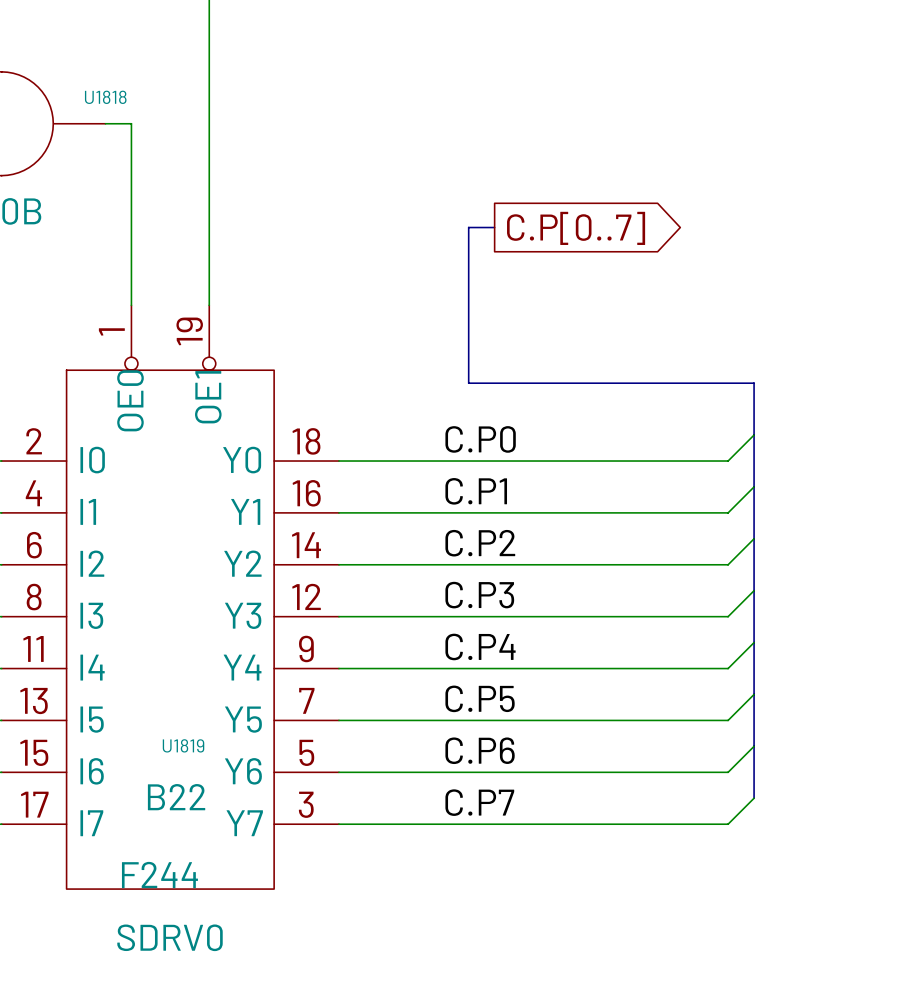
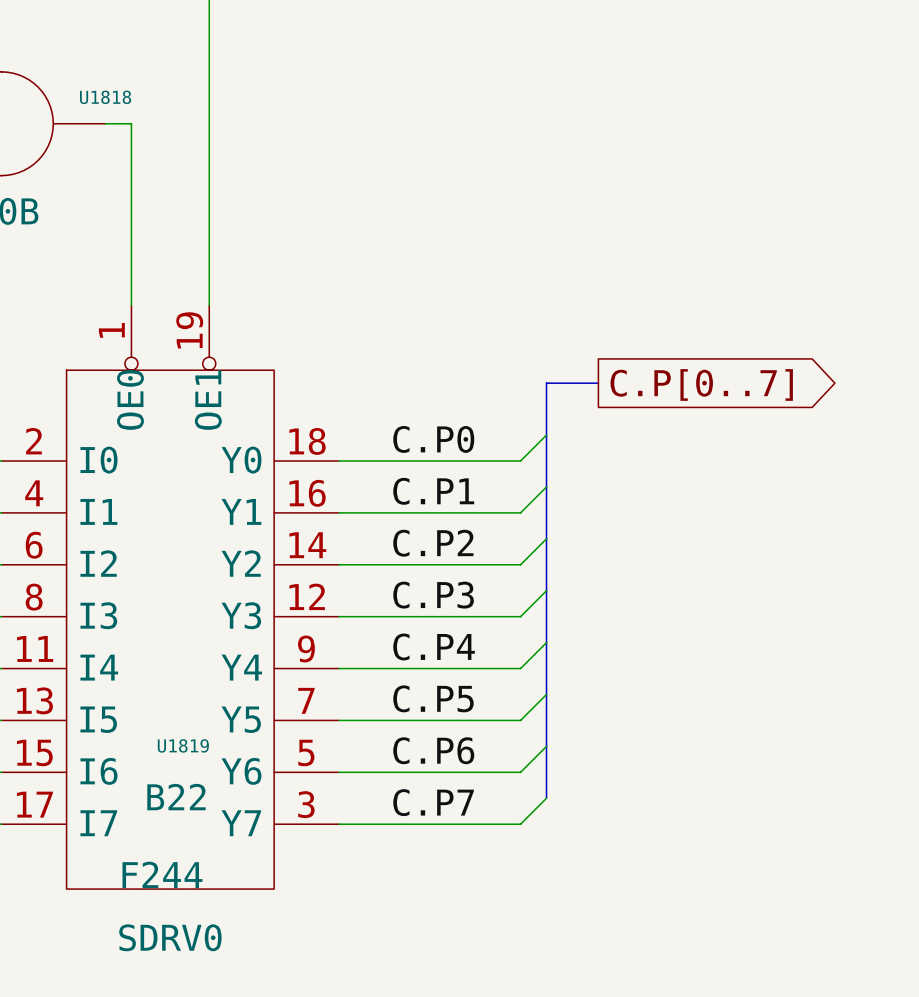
bus: (494, 227) (468, 227) (468, 383) (546, 383) -> (546, 798) (546, 383)
global label position: C.P[0..7] (576, 228) -> C.P[0..7] (701, 384)
bus: (598, 383) (754, 383) (754, 798) -> none
wire: (754, 435) (728, 461) (520, 461) -> (546, 435) (520, 461)
label position: C.P0 (480, 439) -> C.P0 (433, 439)
wire: (754, 486) (728, 512) (520, 512) -> (546, 486) (520, 512)
label position: C.P1 (476, 491) -> C.P1 (433, 491)
wire: (754, 538) (728, 564) (520, 564) -> (546, 538) (520, 564)
label position: C.P2 (480, 543) -> C.P2 (433, 543)
wire: (754, 590) (728, 616) (520, 616) -> (546, 590) (520, 616)
label position: C.P3 (479, 595) -> C.P3 (433, 595)
wire: (754, 642) (728, 668) (520, 668) -> (546, 642) (520, 668)
label position: C.P4 (480, 646) -> C.P4 (434, 646)
wire: (754, 694) (728, 720) (520, 720) -> (546, 694) (520, 720)
label position: C.P5 (480, 698) -> C.P5 (433, 698)
wire: (754, 746) (728, 772) (520, 772) -> (546, 746) (520, 772)
label position: C.P6 (480, 750) -> C.P6 (433, 750)
wire: (754, 798) (728, 824) (520, 824) -> (546, 798) (520, 824)
label position: C.P7 (479, 802) -> C.P7 (433, 802)

